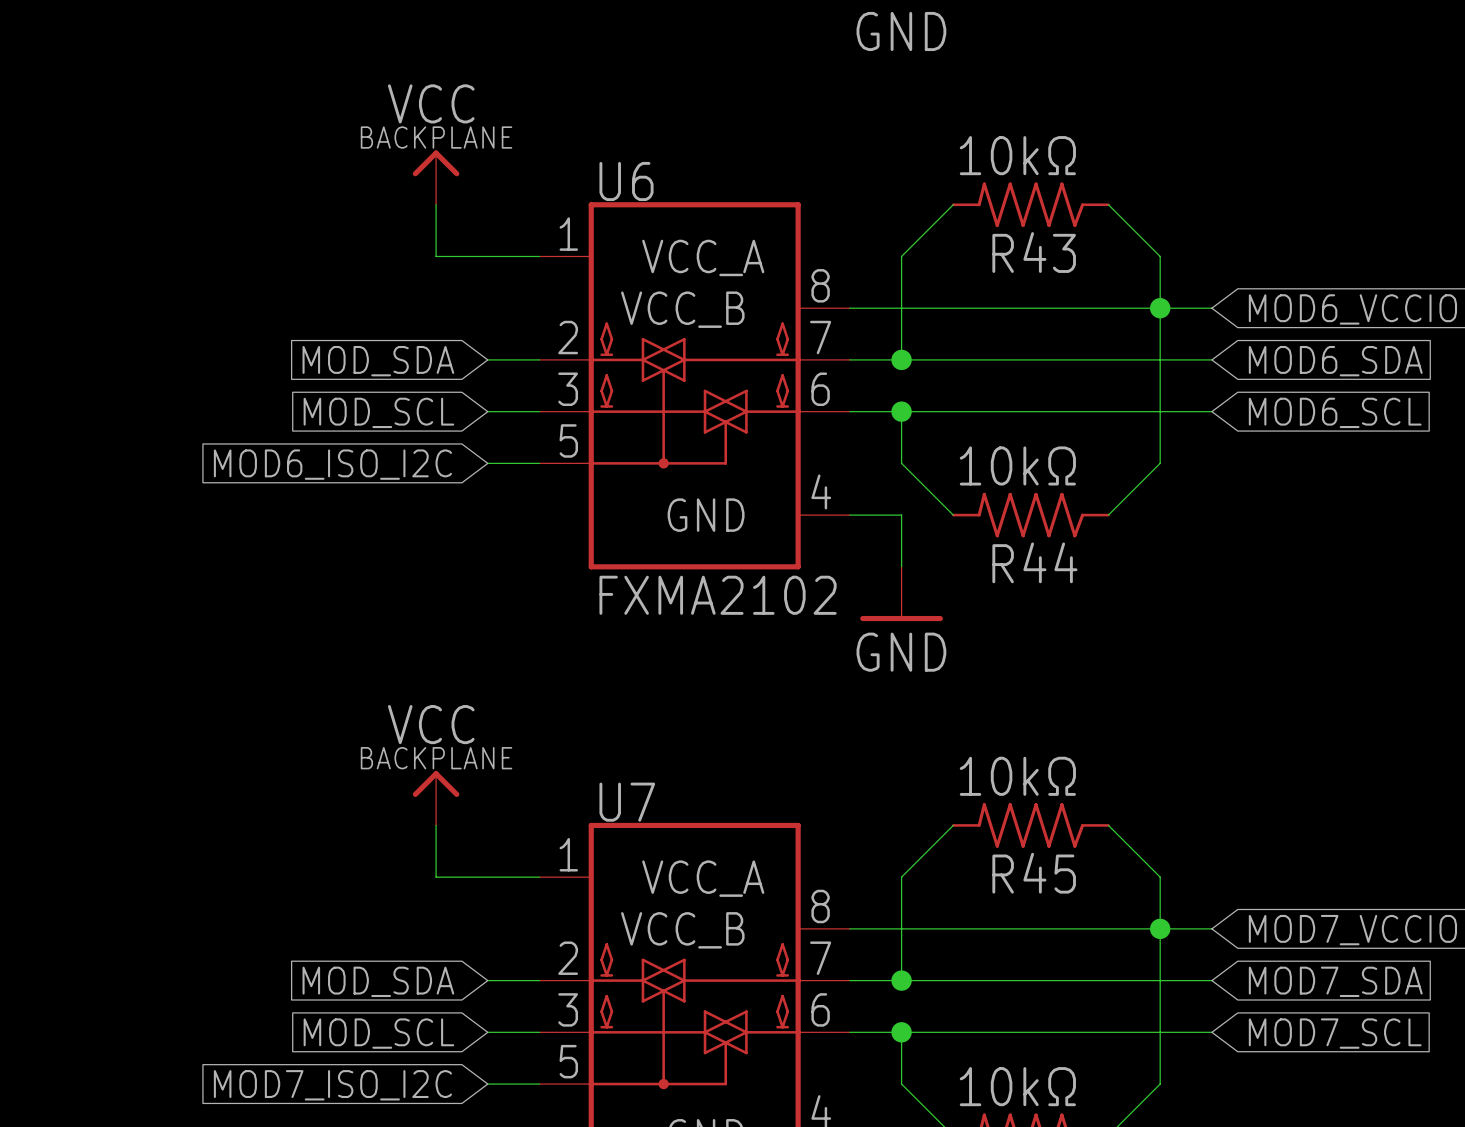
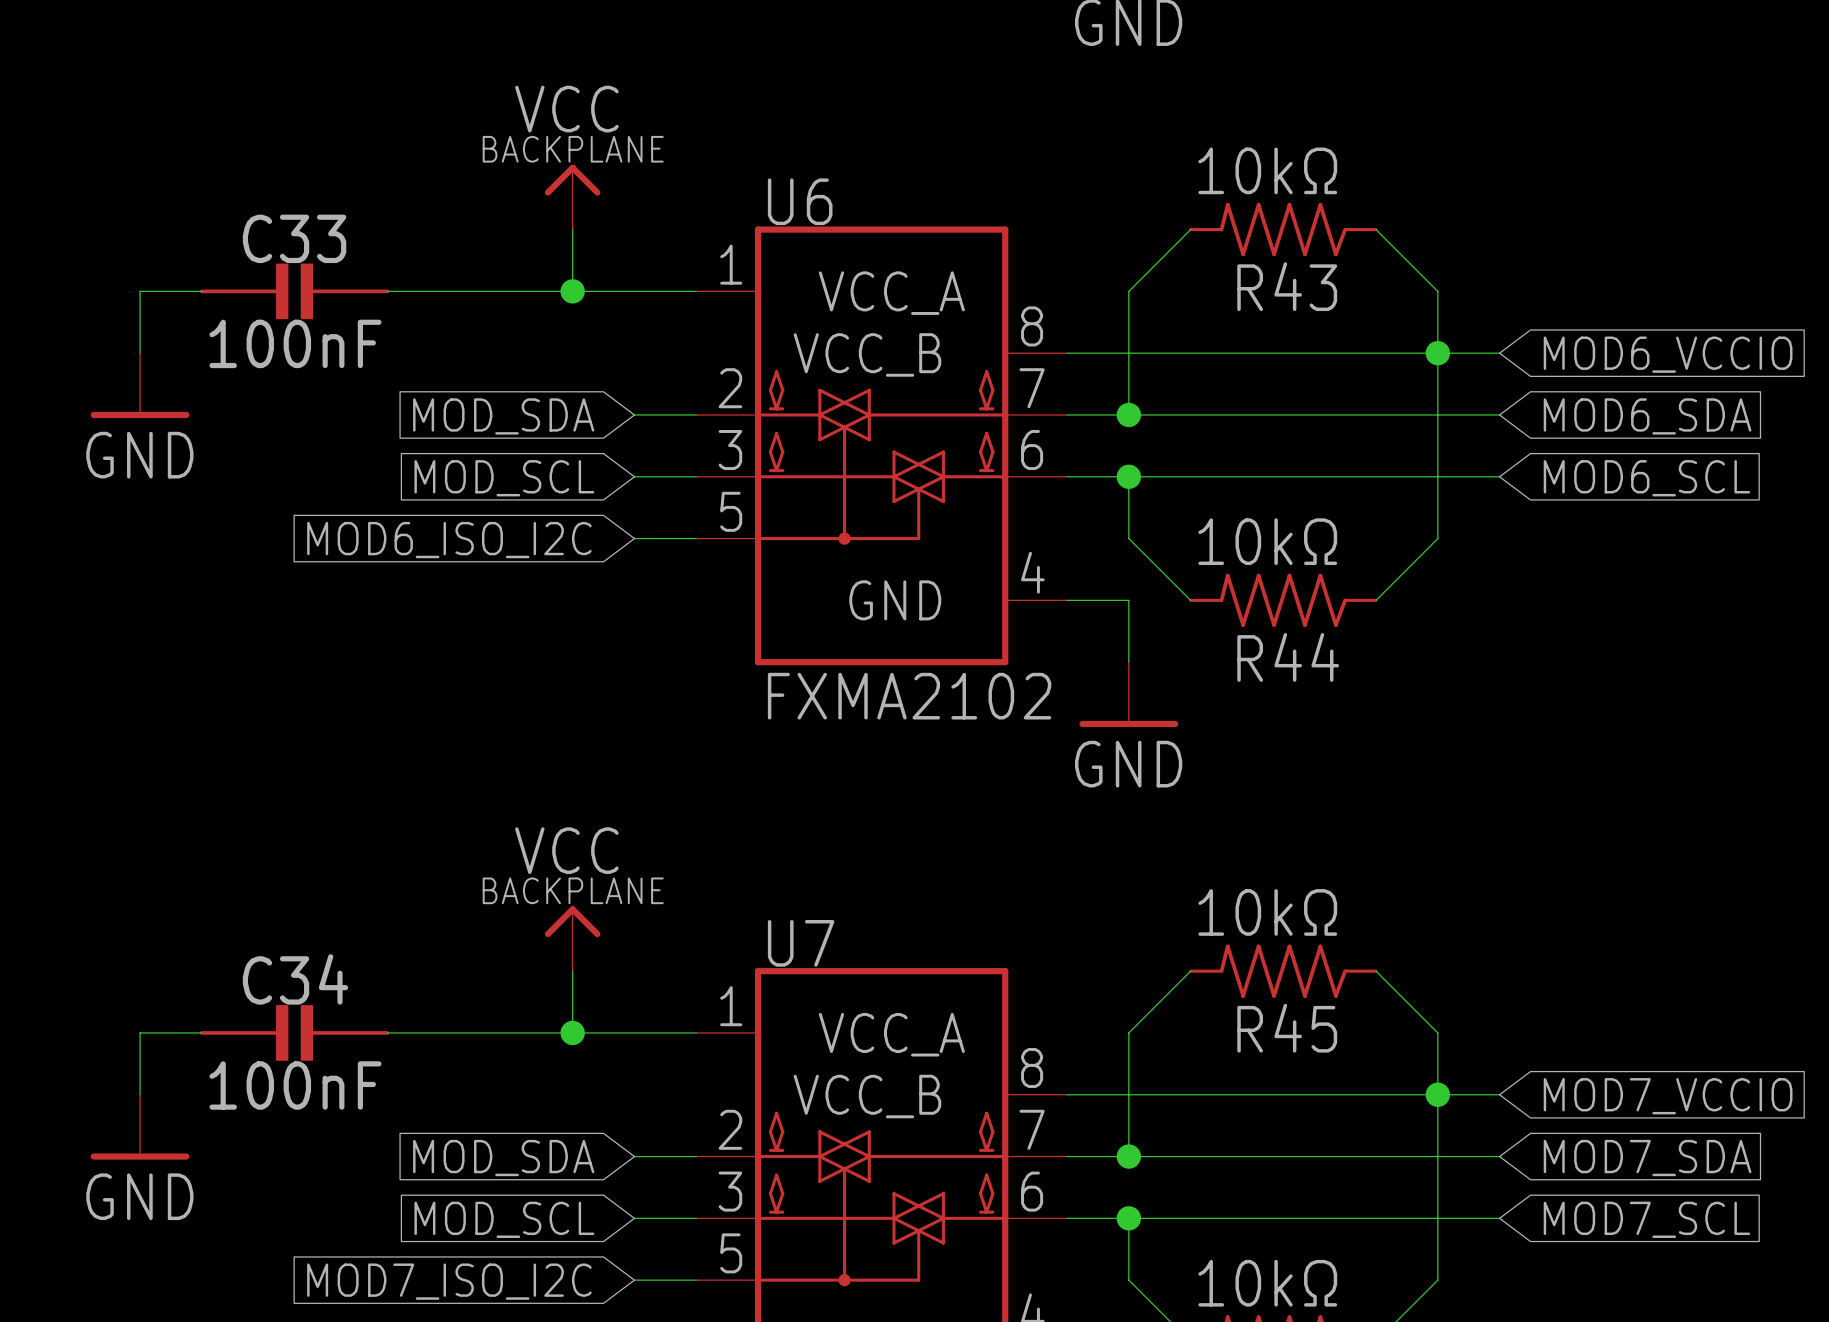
wire: none -> (201, 291) (140, 291) (140, 353)
C33: none -> 100nF (294, 291)
wire: none -> (387, 291) (572, 291)
junction: none -> (572, 291)
power symbol: none -> GND (140, 385)
wire: none -> (201, 1032) (140, 1032) (140, 1094)
C34: none -> 100nF (294, 1032)
wire: none -> (387, 1032) (572, 1032)
junction: none -> (572, 1032)
power symbol: none -> GND (140, 1127)

